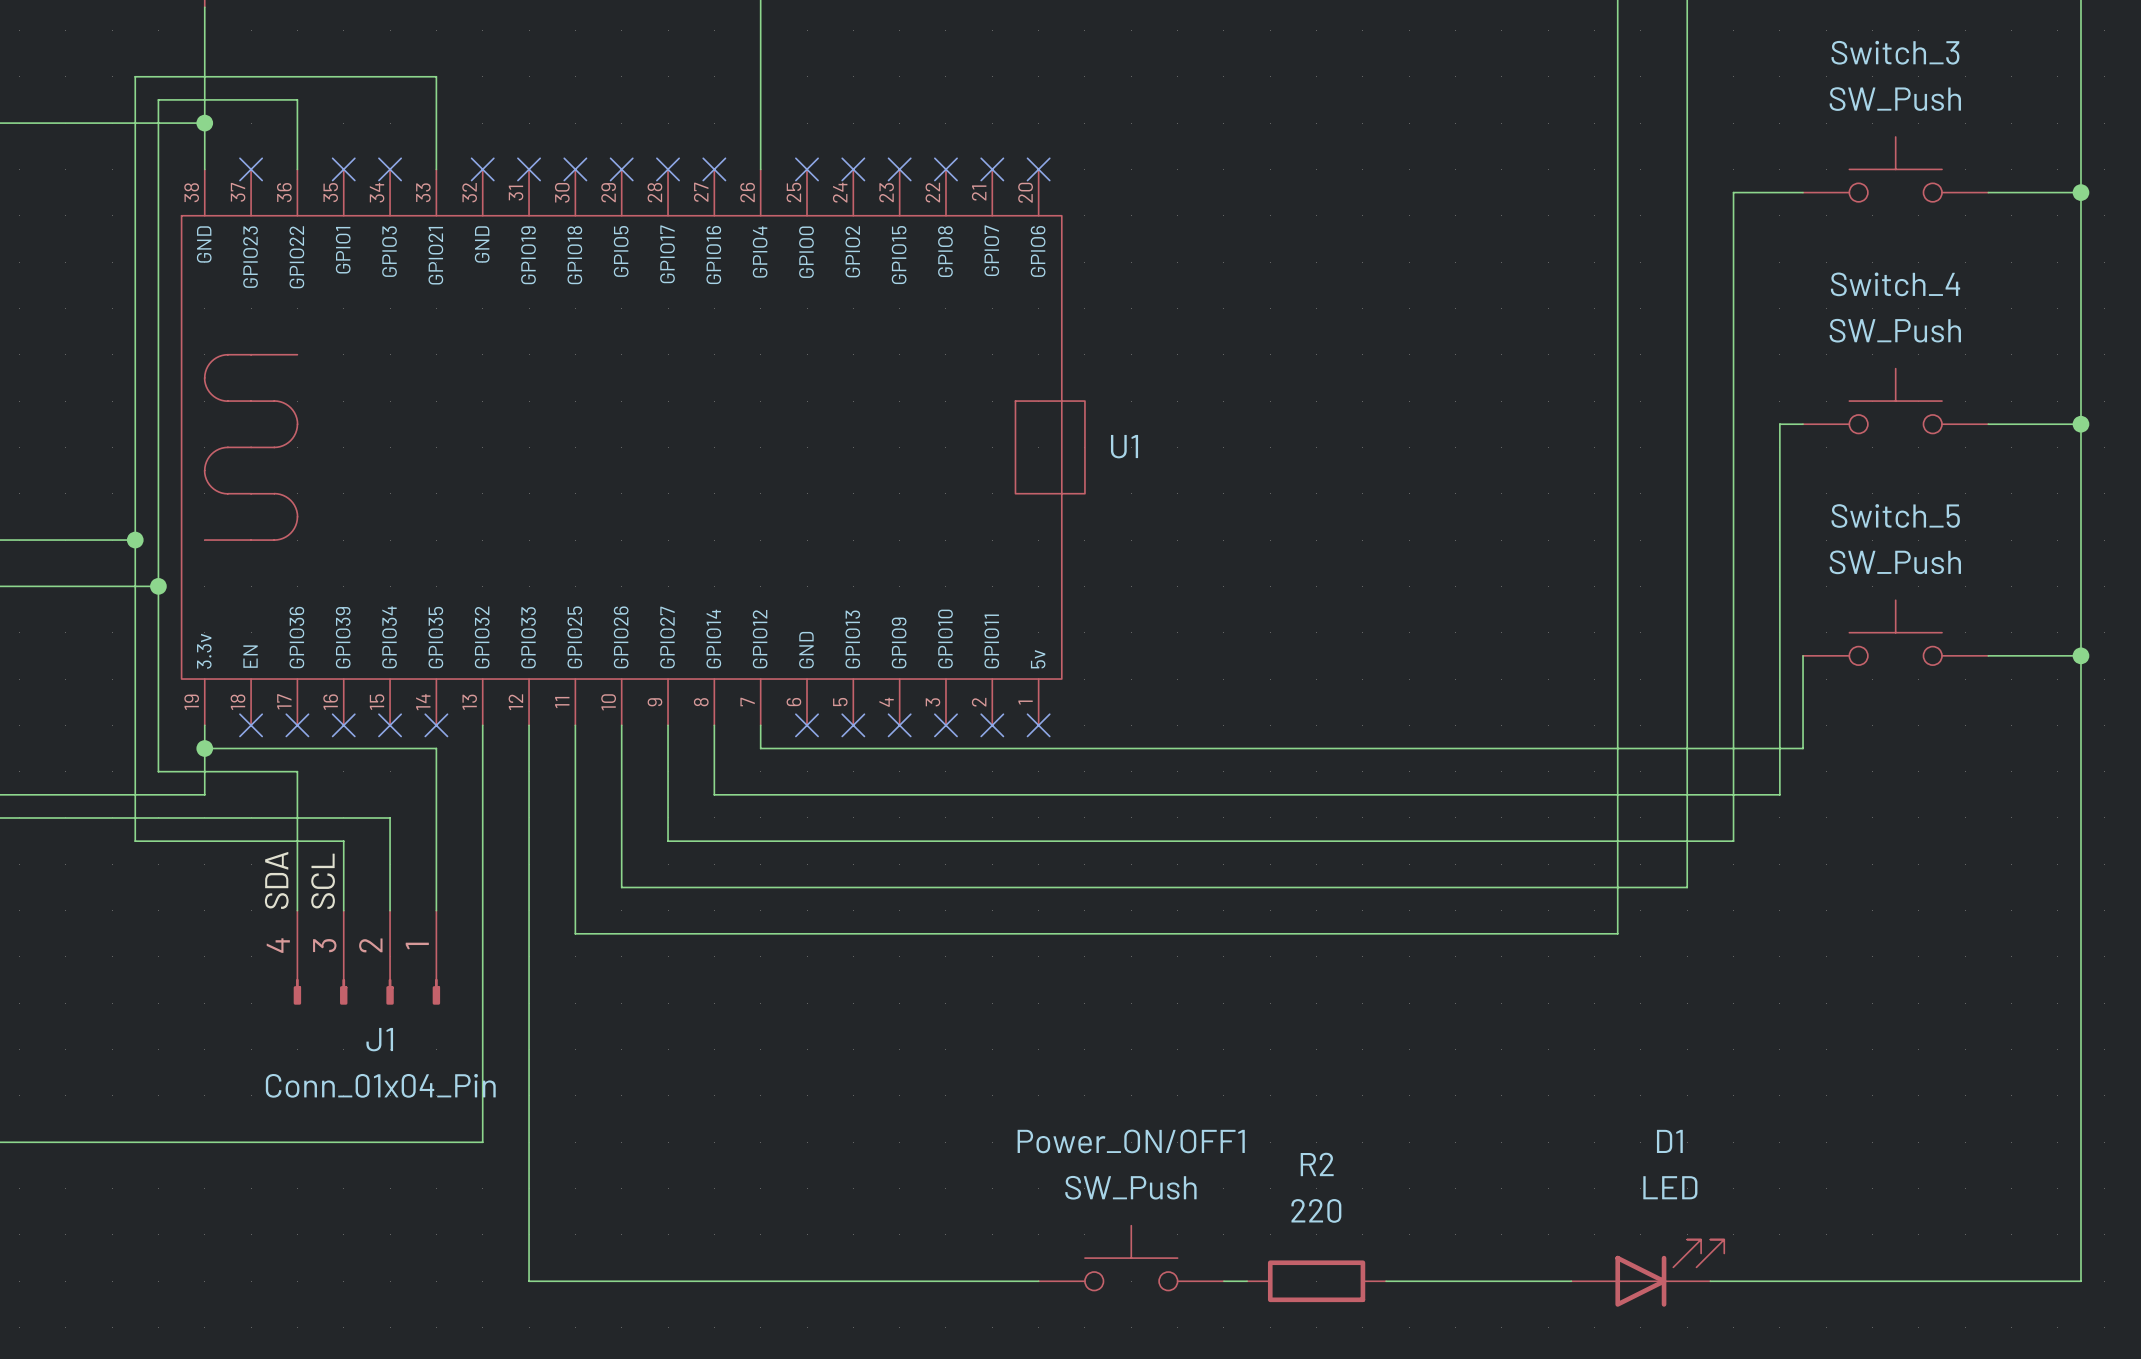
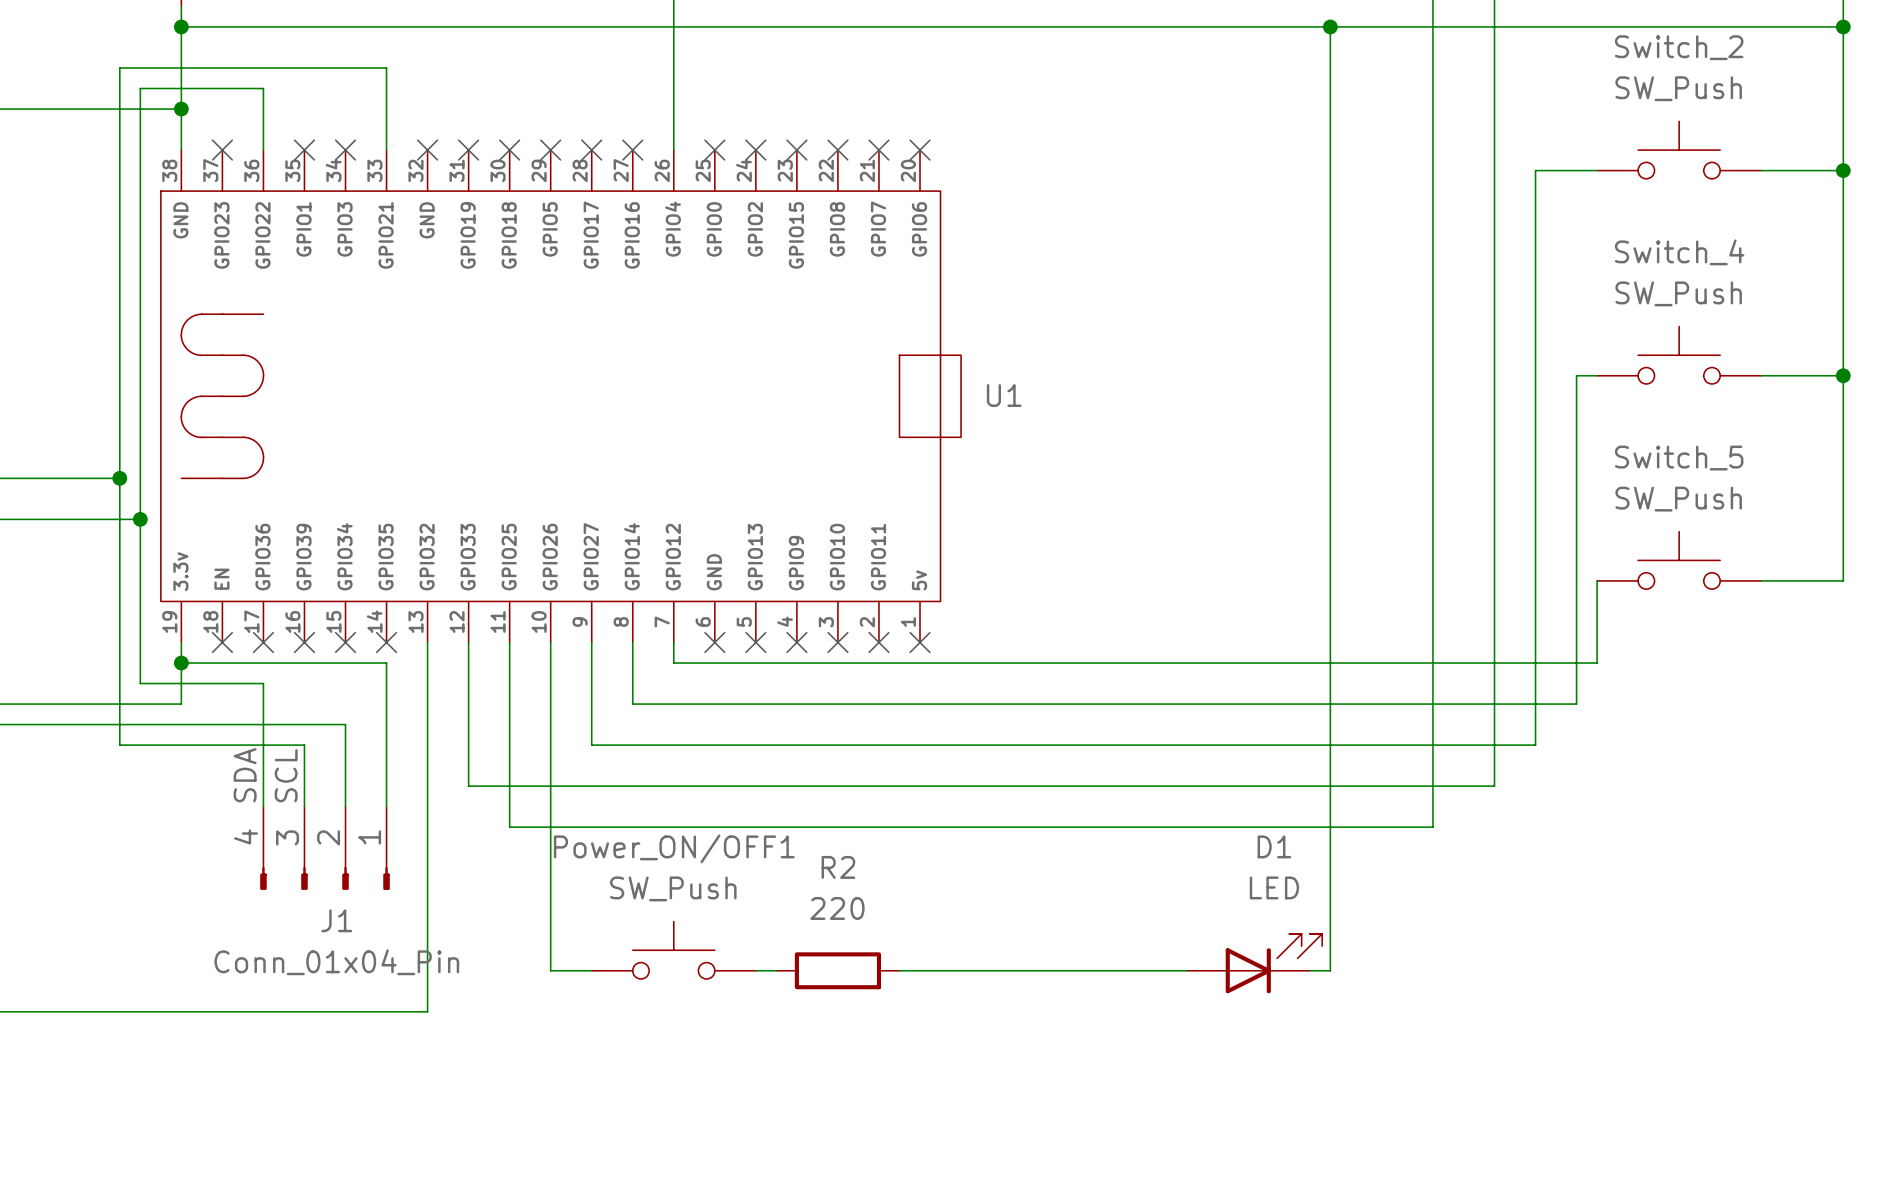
wire: none -> (181, 26) (1843, 26)
junction: none -> (181, 26)
wire: none -> (1330, 26) (1330, 970) (1309, 970)
junction: none -> (1330, 26)
junction: none -> (1843, 26)
Switch_3 name: Switch_3 (1895, 52) -> Switch_2 (1679, 47)
wire: (2080, 655) (2080, 1281) (1710, 1281) -> none
junction: (2080, 655) -> none
wire: (529, 887) (529, 1281) (1038, 1281) -> (468, 786) (550, 786) (550, 970) (591, 970)
wire: none -> (899, 970) (1186, 970)
Power_ON/OFF1 position: (1131, 1258) -> (673, 950)
D1 position: (1647, 1273) -> (1254, 963)
wire: (1223, 1281) (1247, 1281) -> (755, 970) (776, 970)
R2 position: (1316, 1281) -> (837, 970)
wire: (1386, 1281) (1571, 1281) -> none

